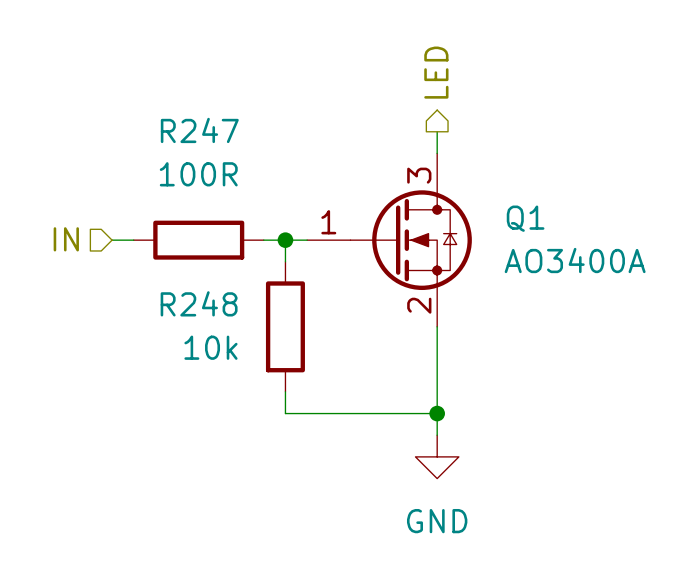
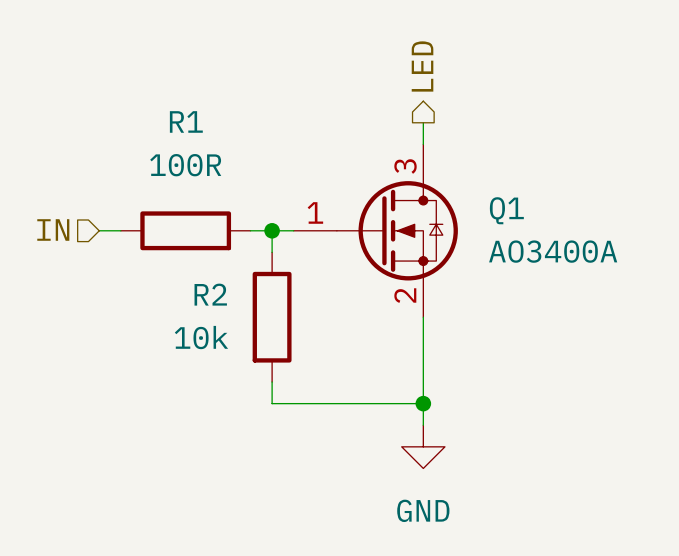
R247 name: R247 (199, 130) -> R1 (186, 121)
R248 name: R248 (199, 303) -> R2 (210, 294)

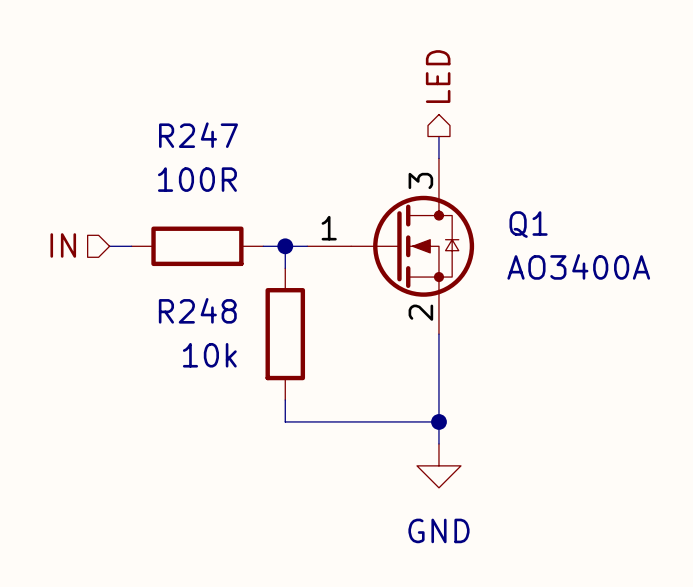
R1 name: R1 (186, 121) -> R247 (198, 135)
R2 name: R2 (210, 294) -> R248 (197, 310)

